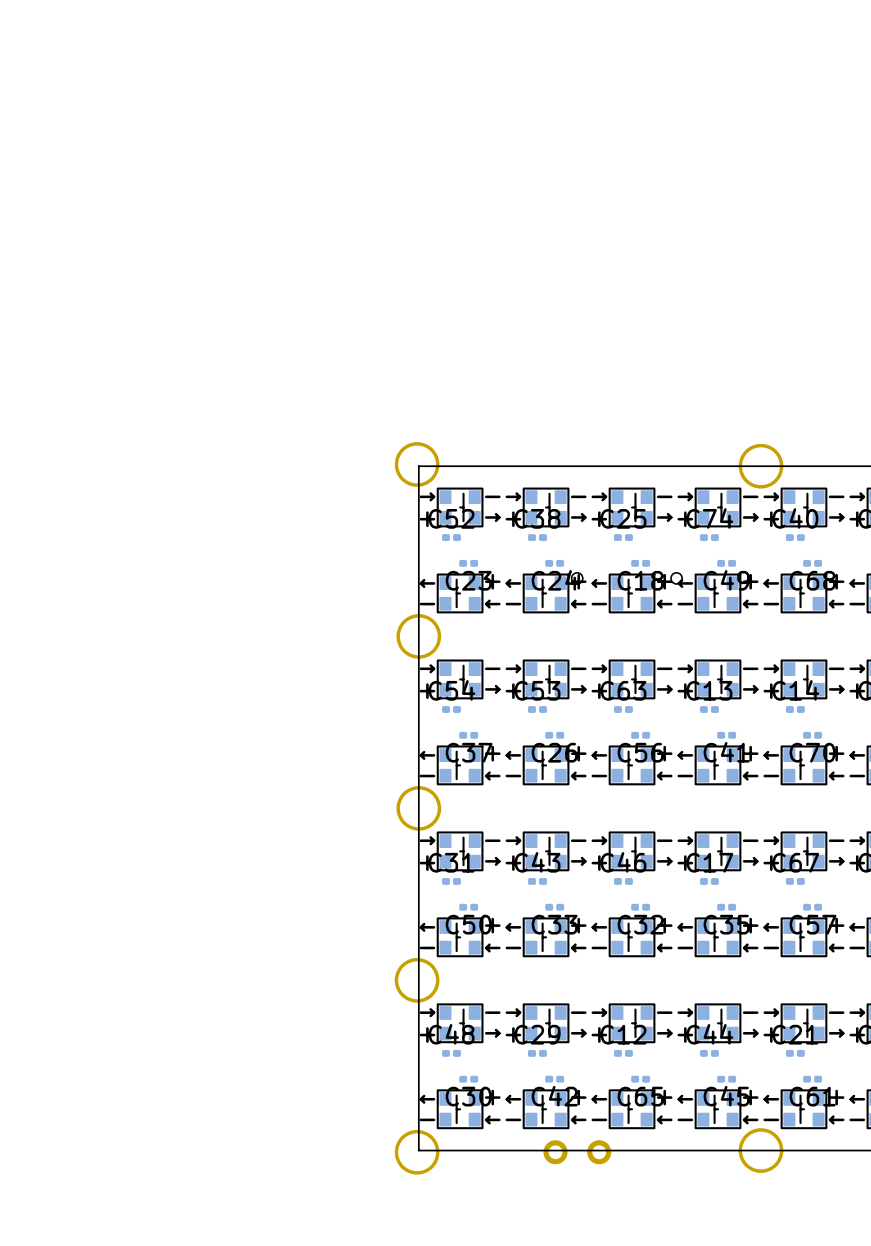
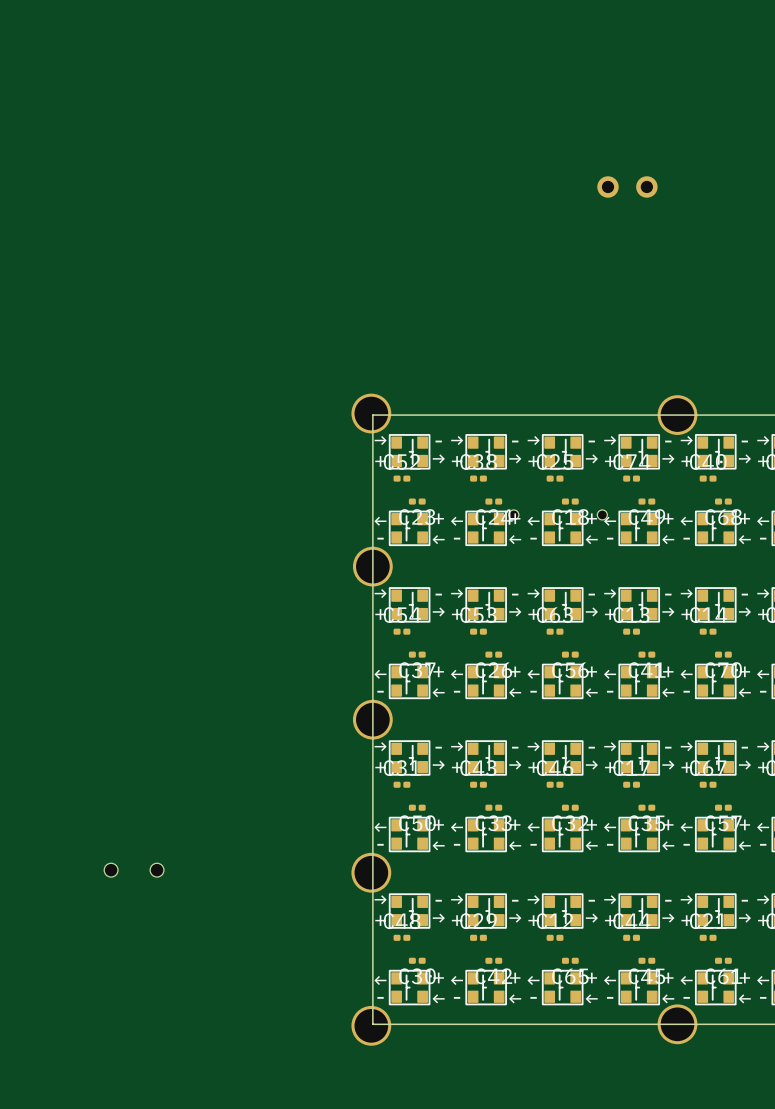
part: none -> (627, 186)
part: none -> (134, 870)
part: (577, 1152) -> none

